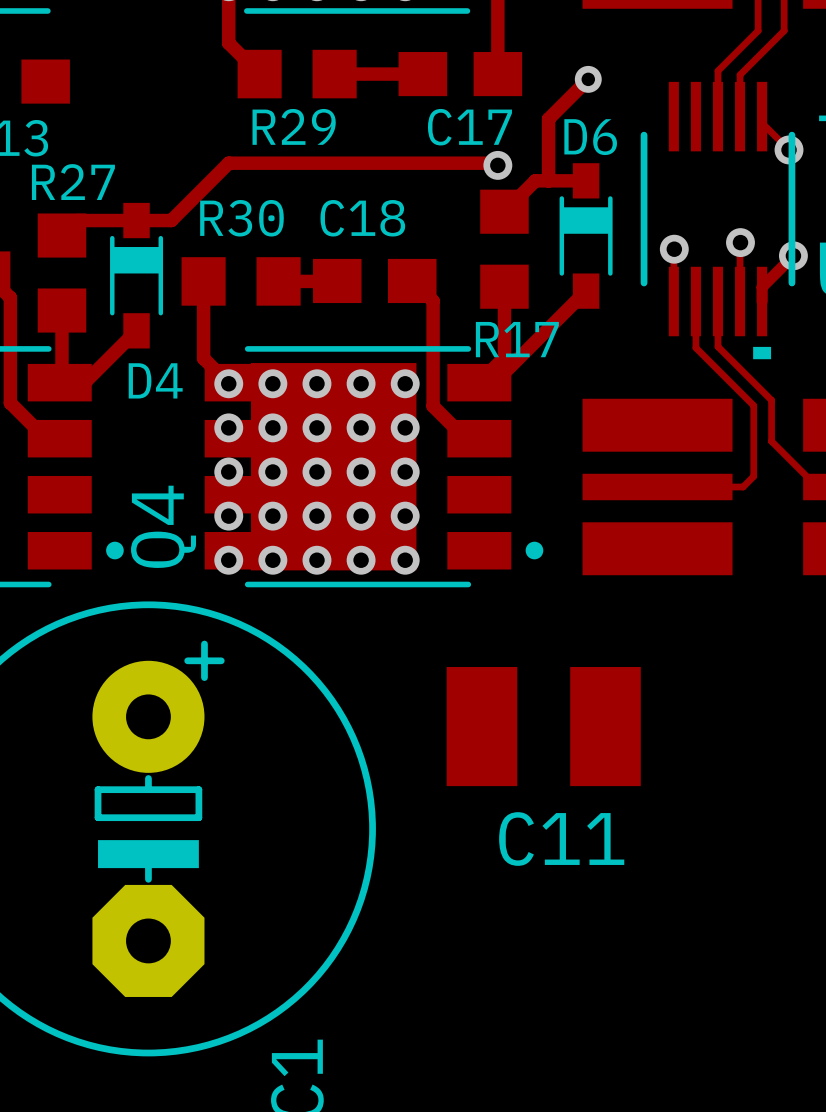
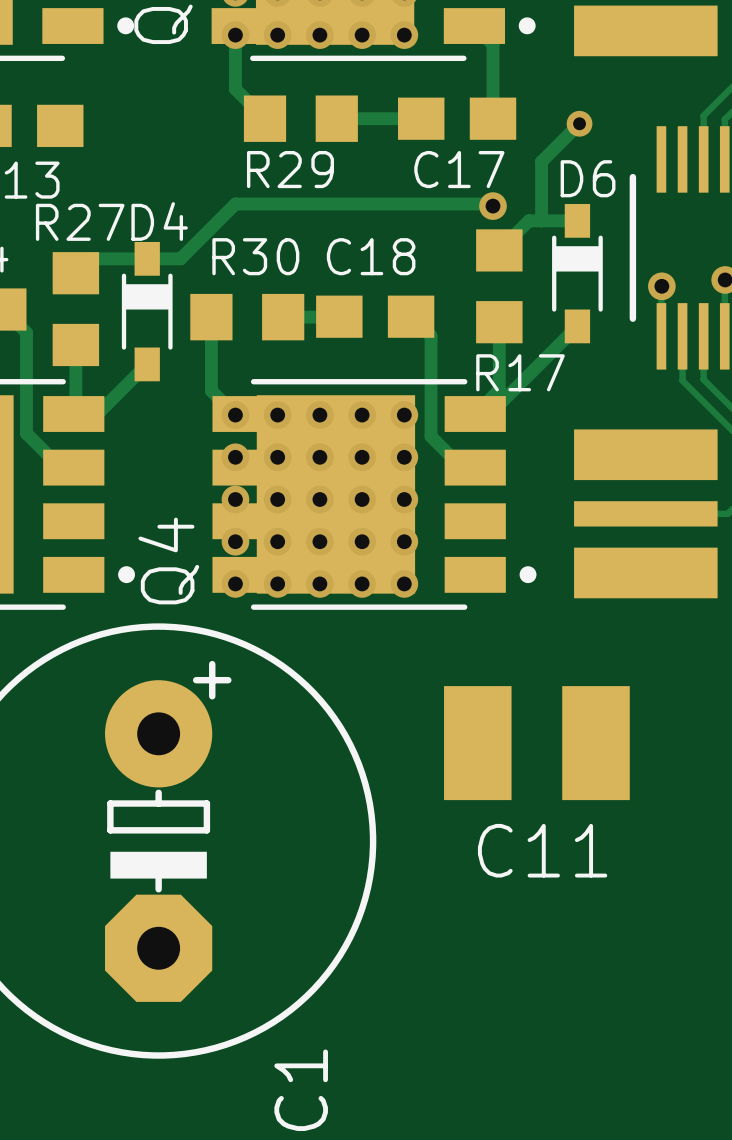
D4 name position: D4 (155, 380) -> D4 (159, 221)

